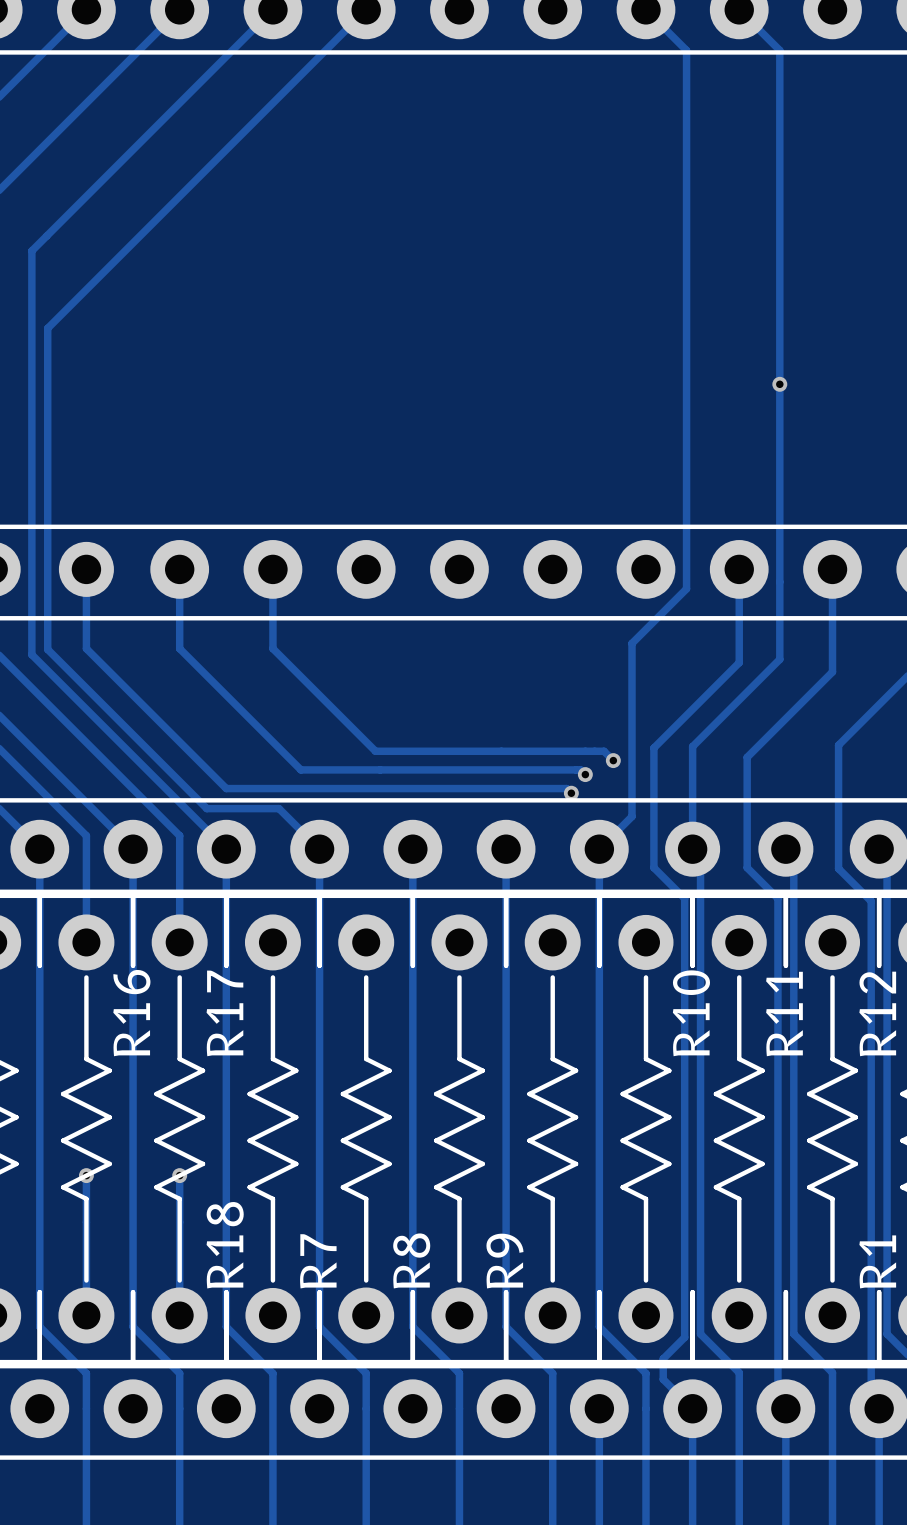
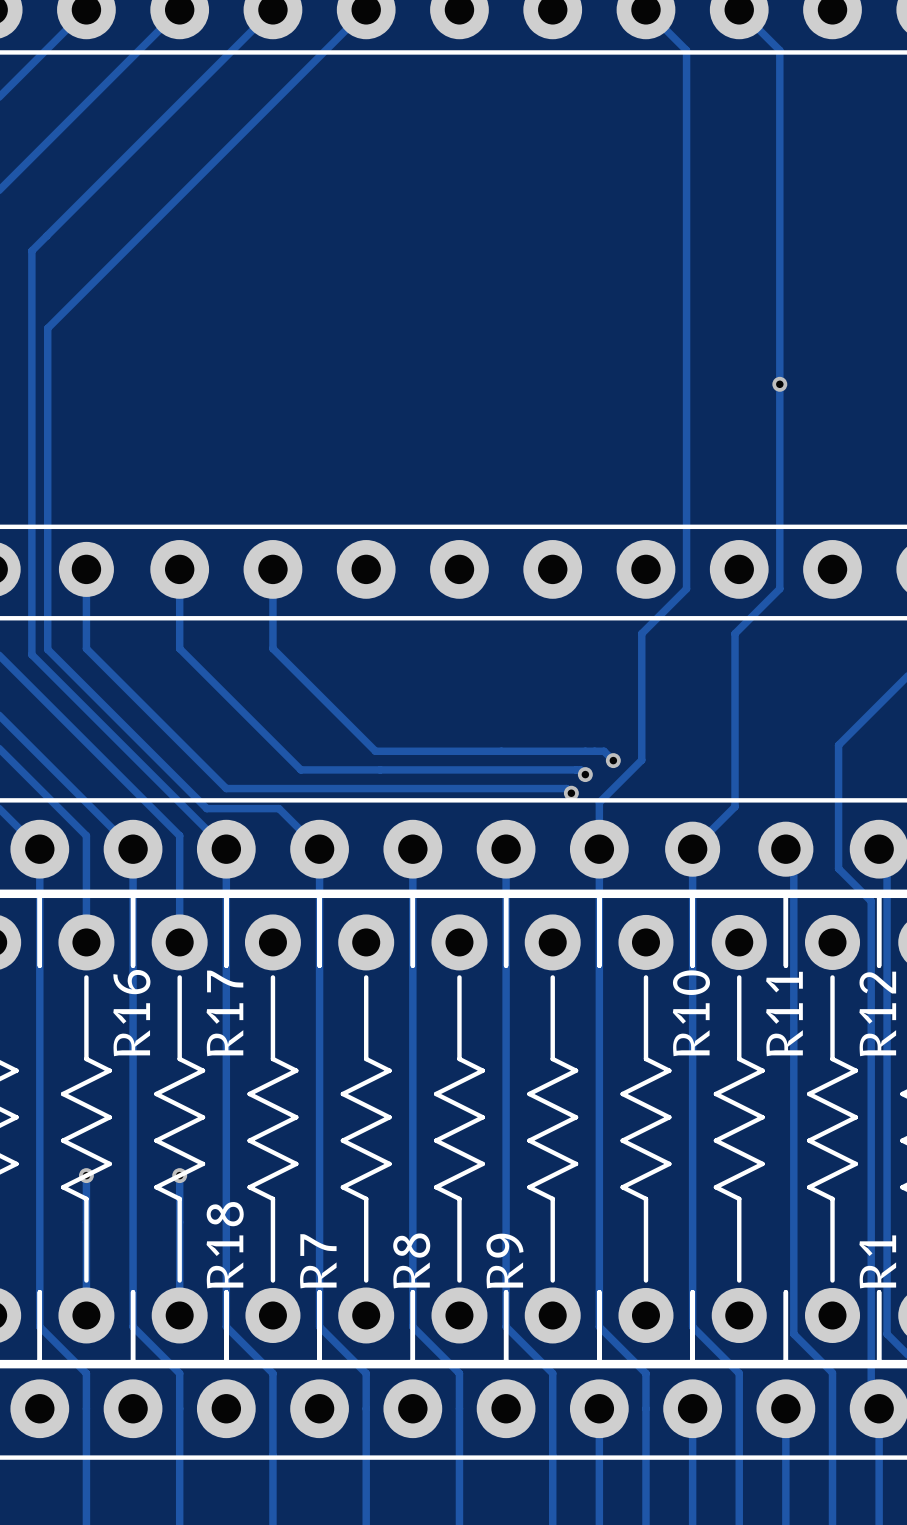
track: (739, 569) (739, 662) (653, 748) (653, 867) (684, 898) (684, 1337) (663, 1358) (663, 1379) (692, 1408) -> none
track: (832, 569) (832, 672) (747, 757) (747, 867) (777, 898) (777, 1400) (785, 1408) -> none
track: (779, 588) (779, 659) (692, 746) (692, 849) (700, 857) (700, 1334) (739, 1372) -> (779, 588) (735, 633) (735, 806) (692, 849) (692, 1326) (739, 1373)
track: (641, 633) (632, 643) (632, 816) (599, 849) -> (641, 633) (641, 760) (599, 802) (599, 849)

